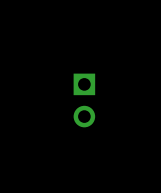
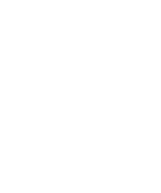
part: (84, 100) -> none

